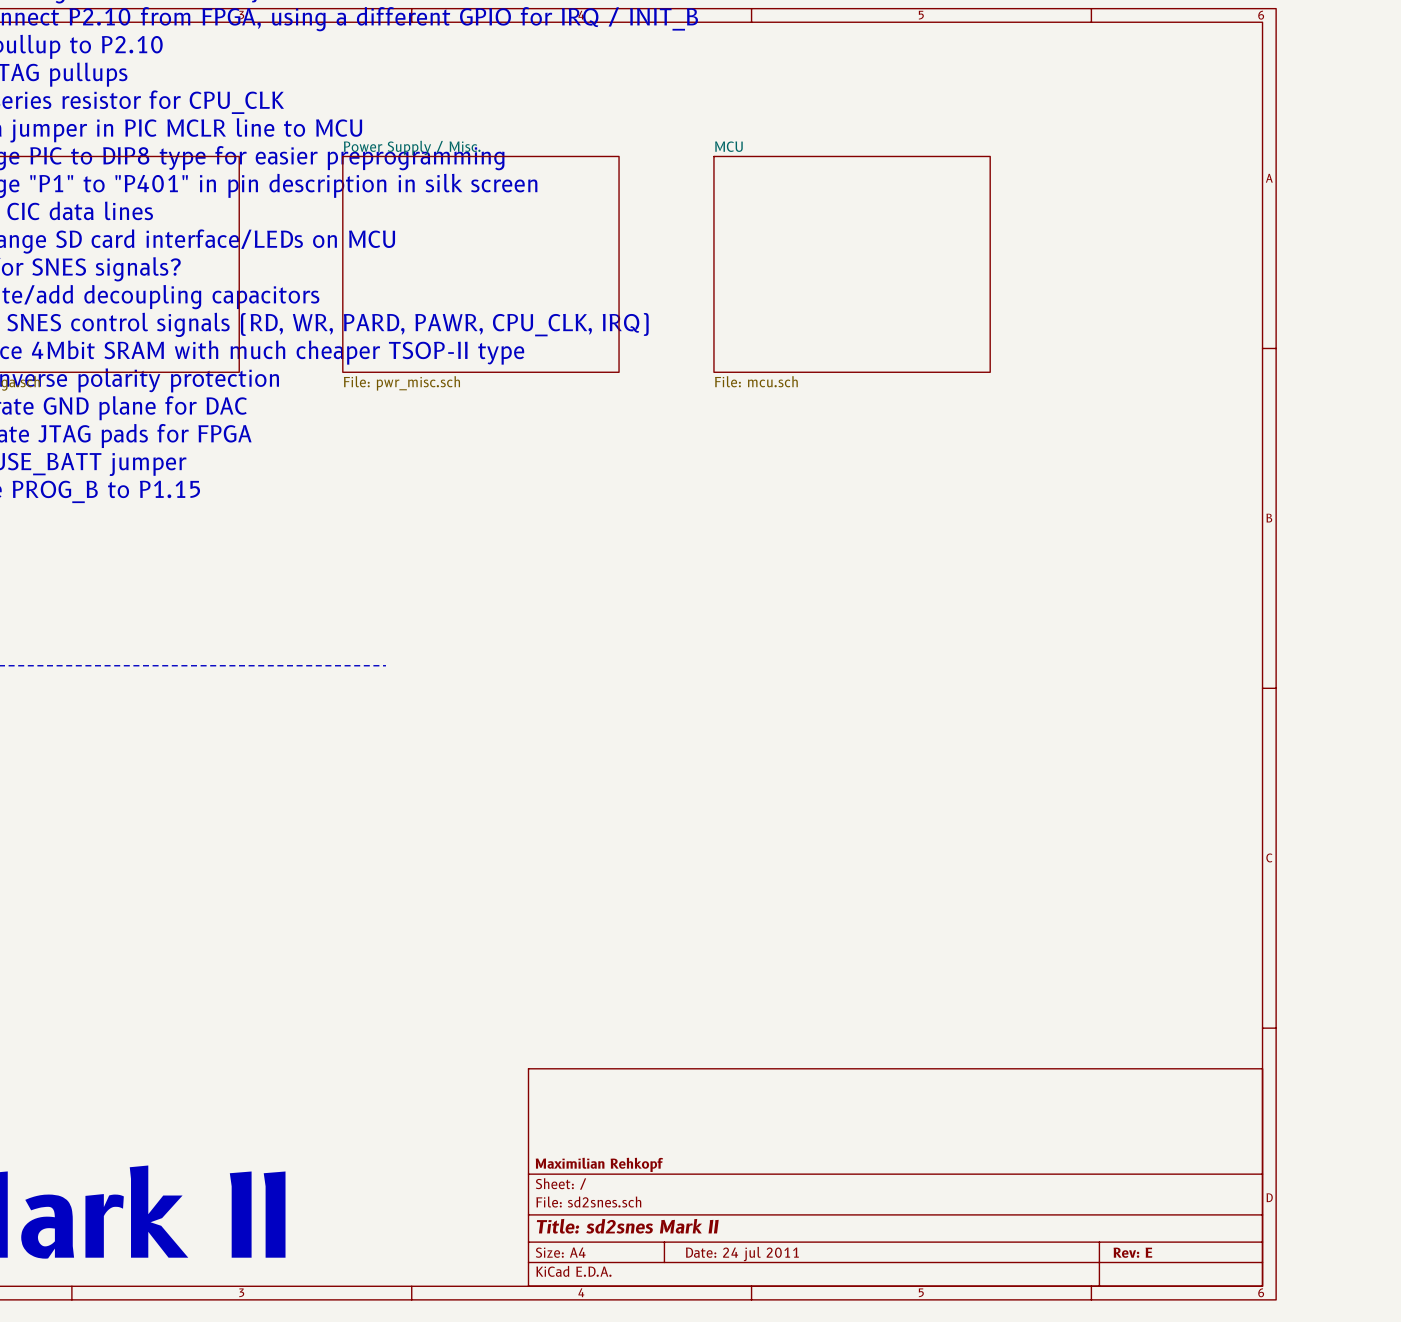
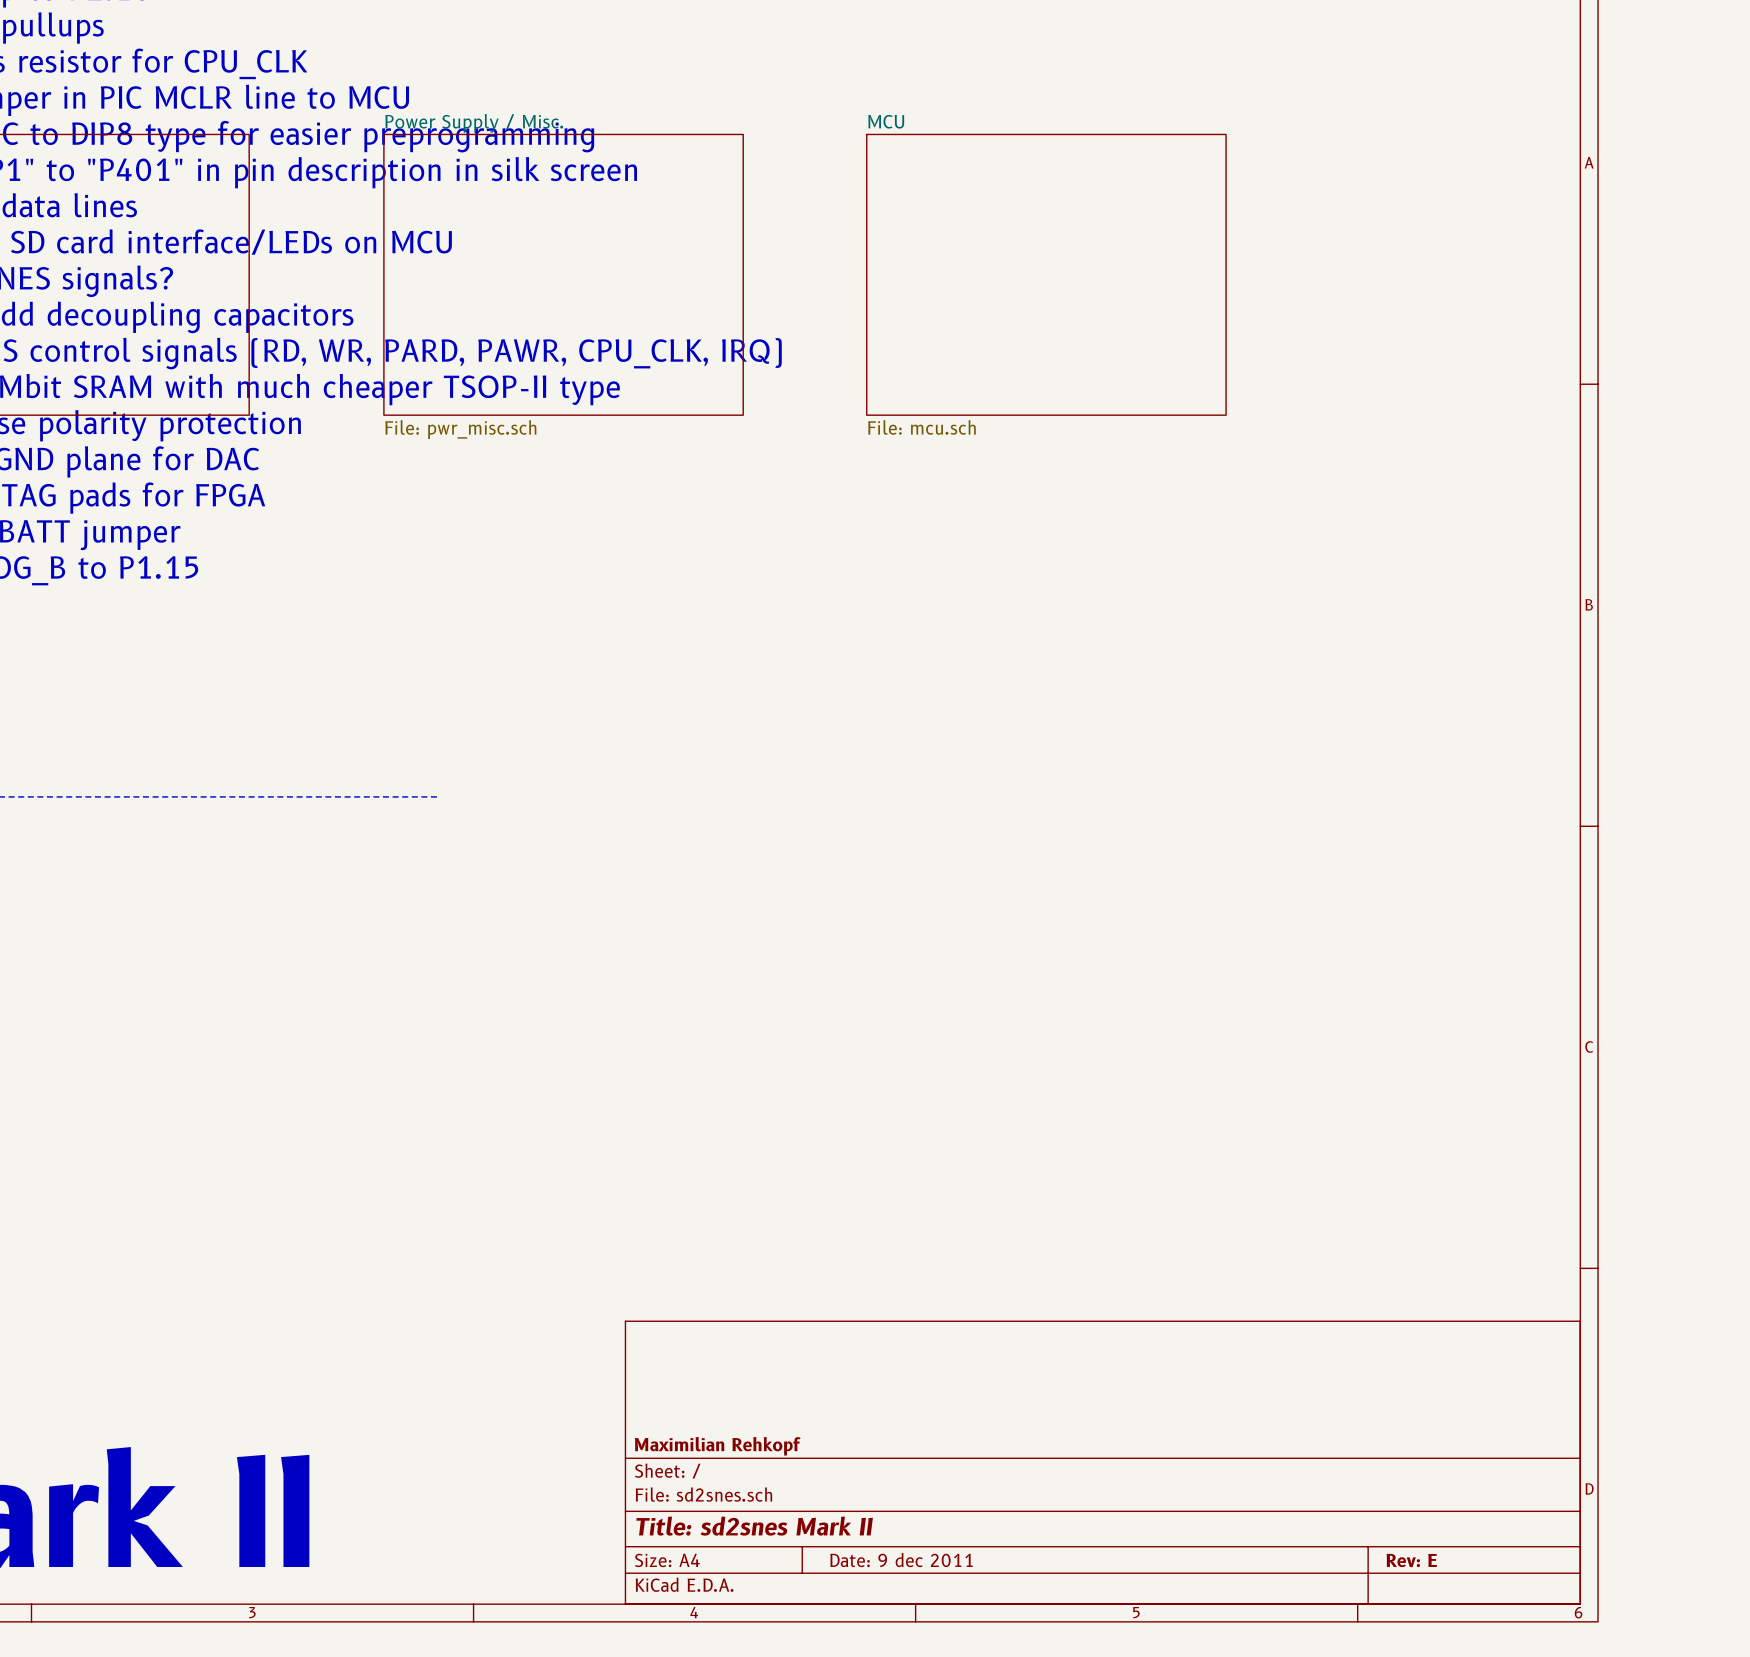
title block: Date: 24 jul 2011 (742, 1254) -> Date: 9 dec 2011 (901, 1559)

